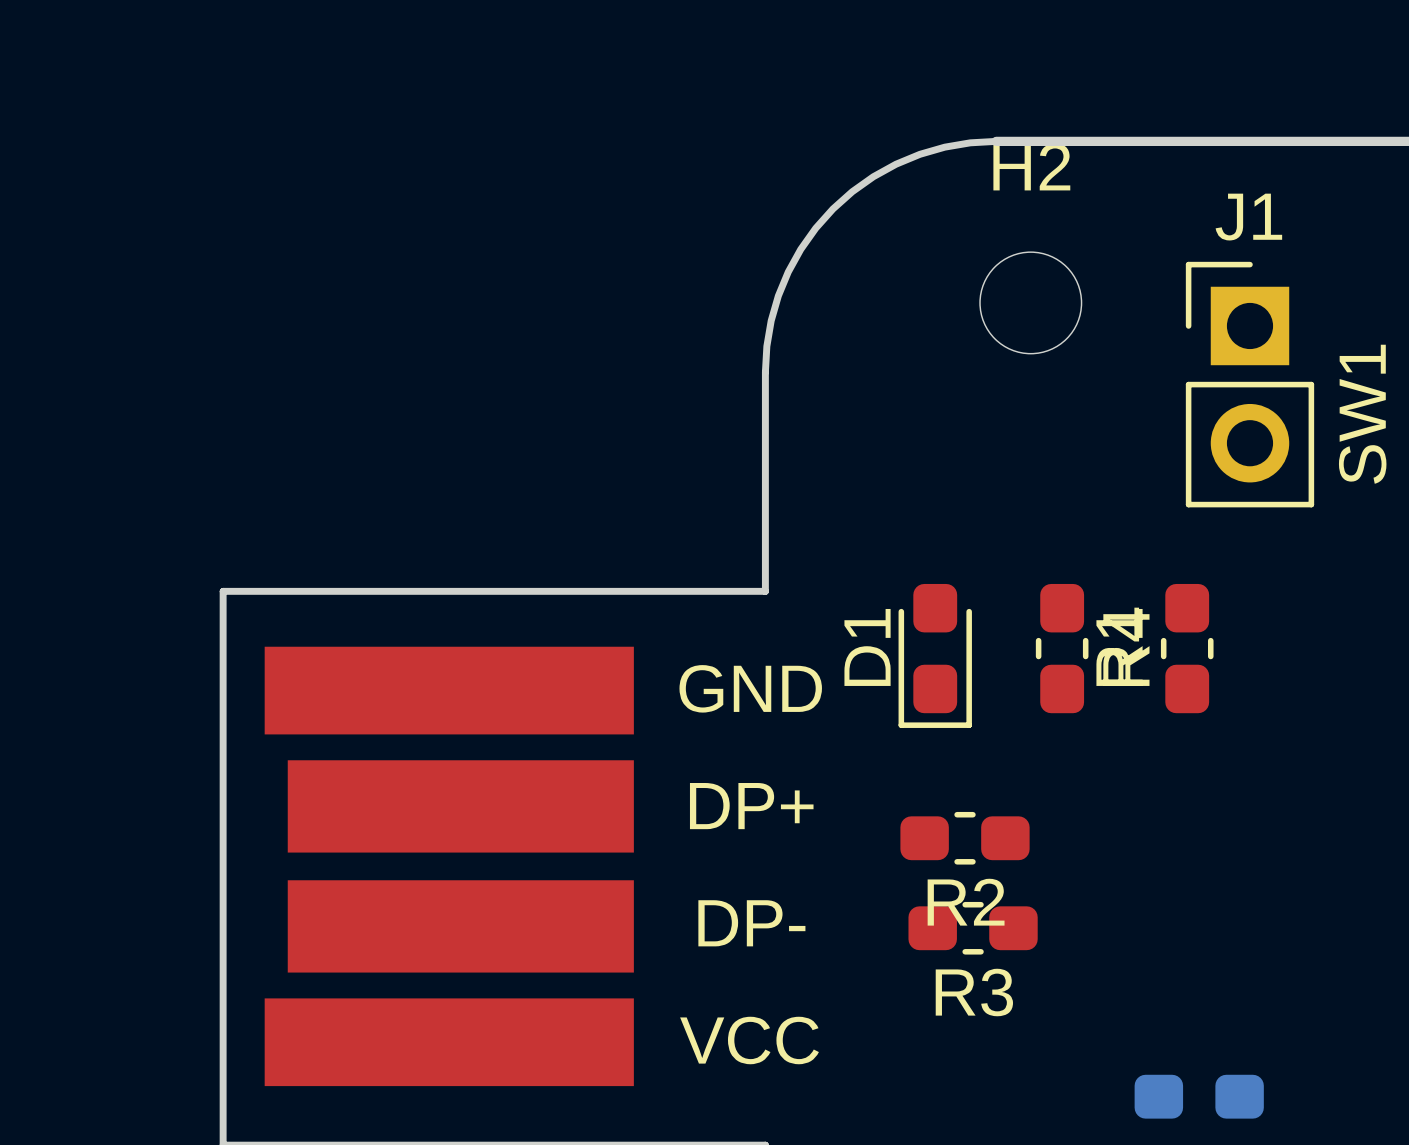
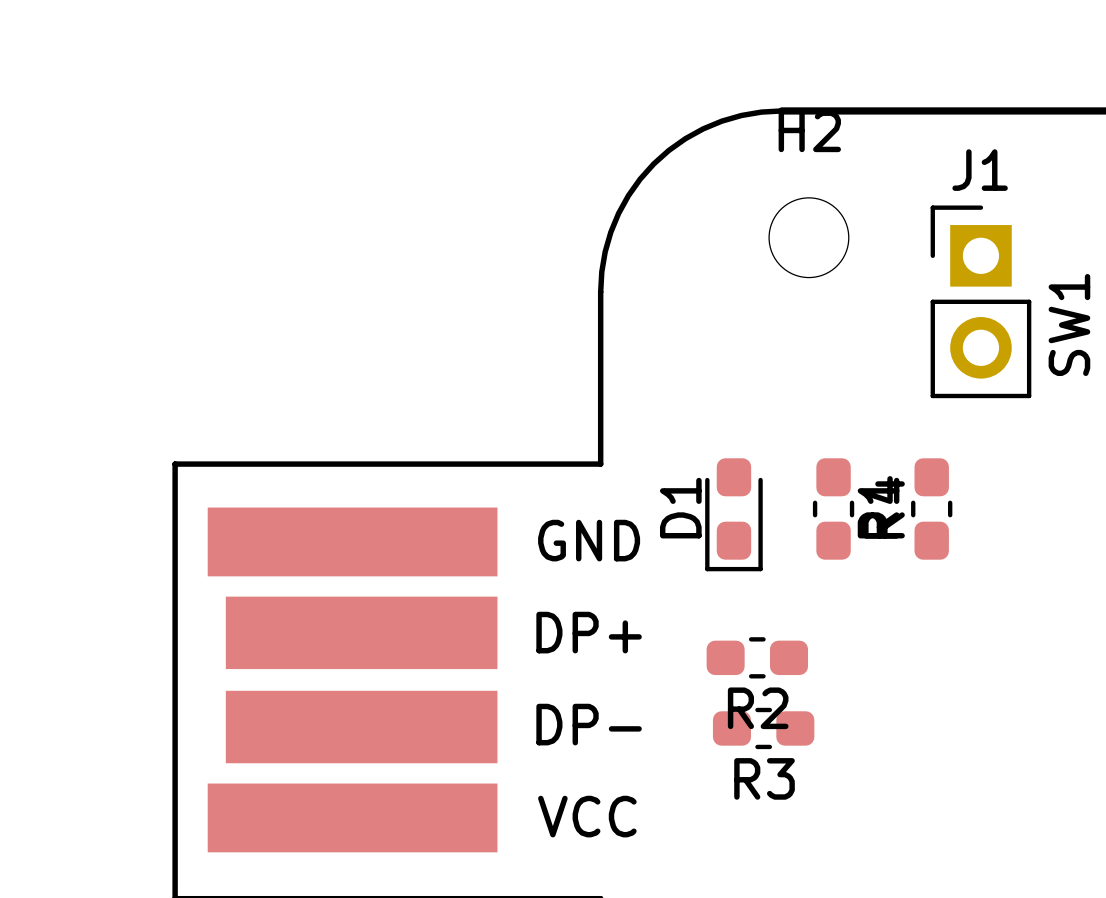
part: (1199, 1096) -> none

